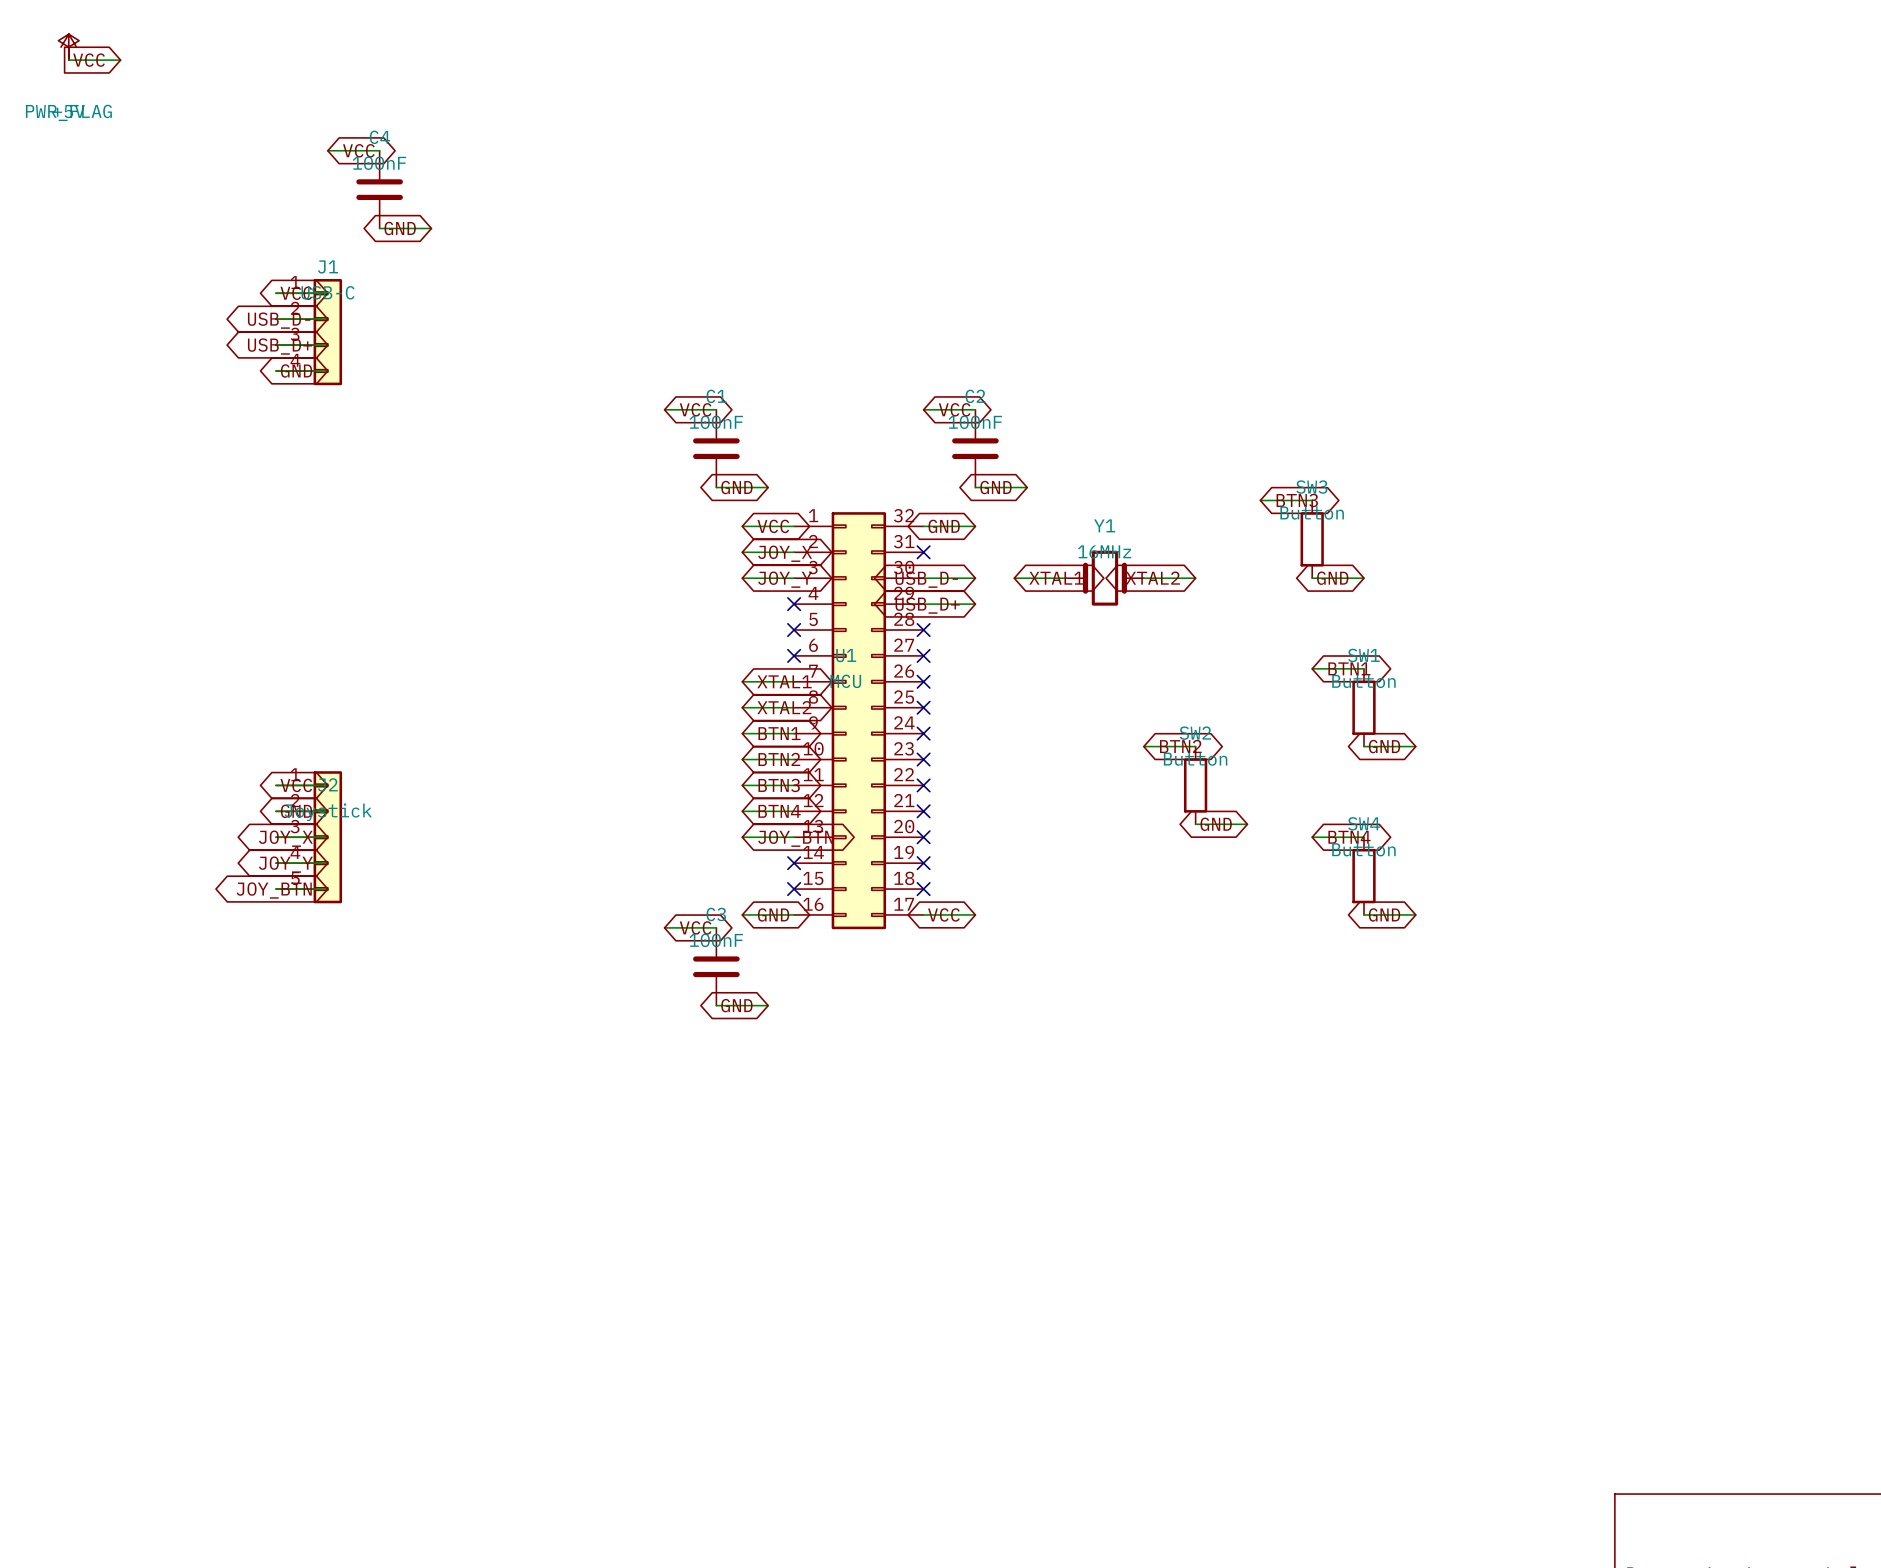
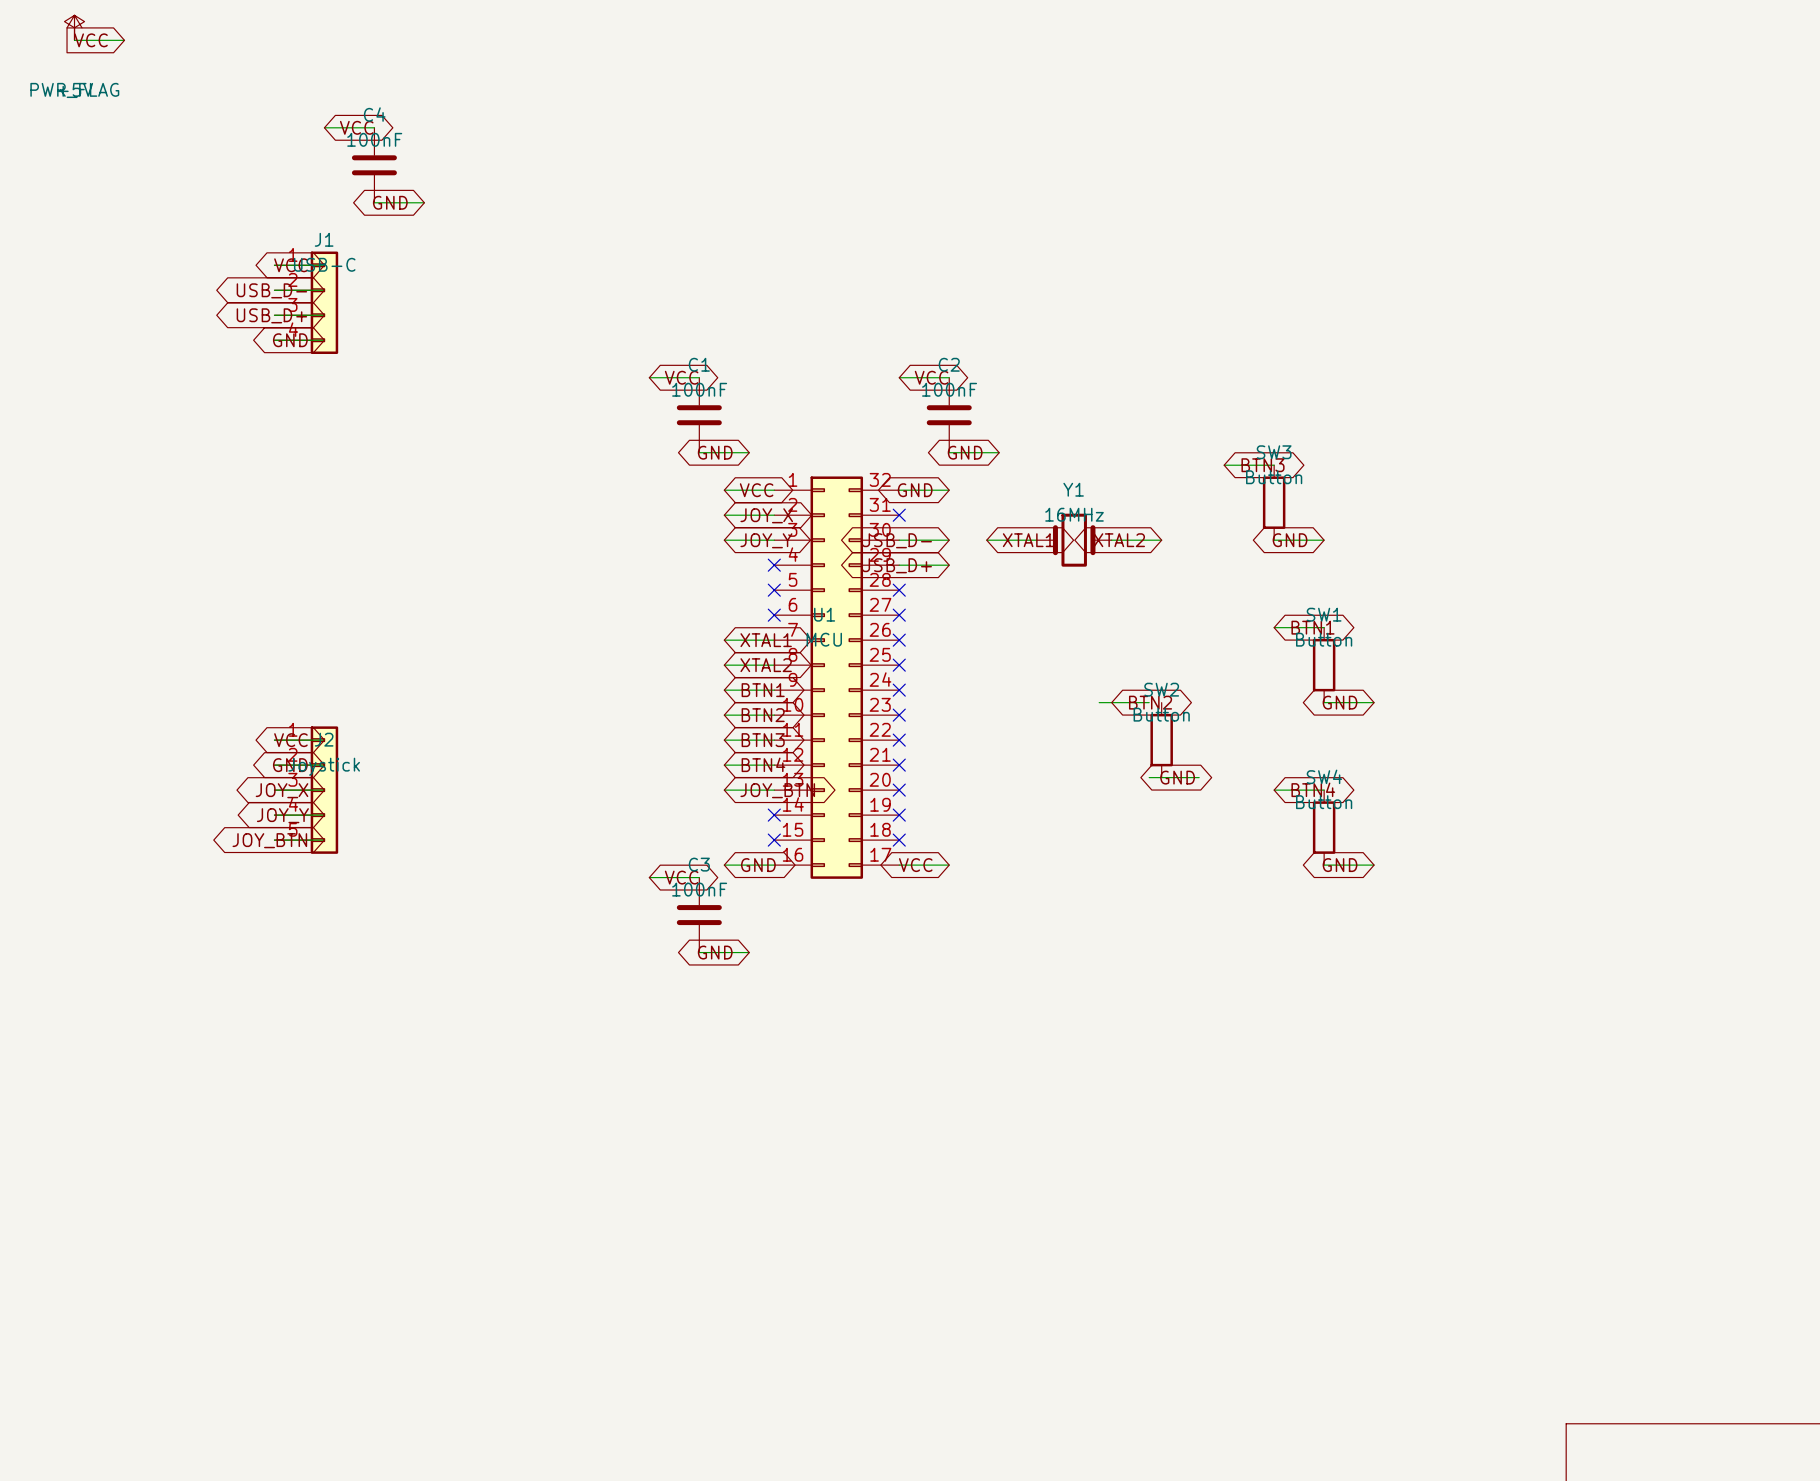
wire: (1182, 746) (1195, 746) -> (1099, 702) (1111, 702)
wire: (1234, 824) (1247, 824) -> (1149, 777) (1161, 777)

